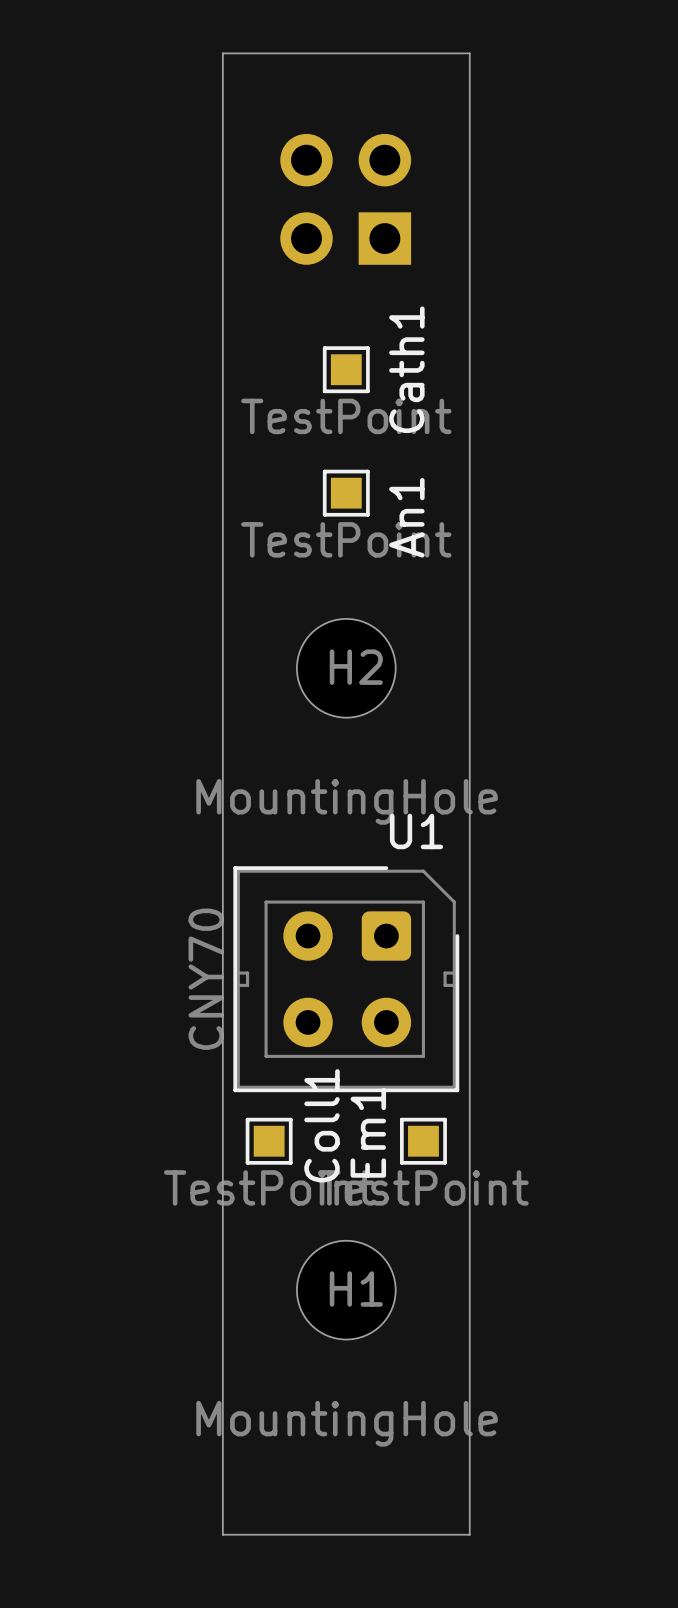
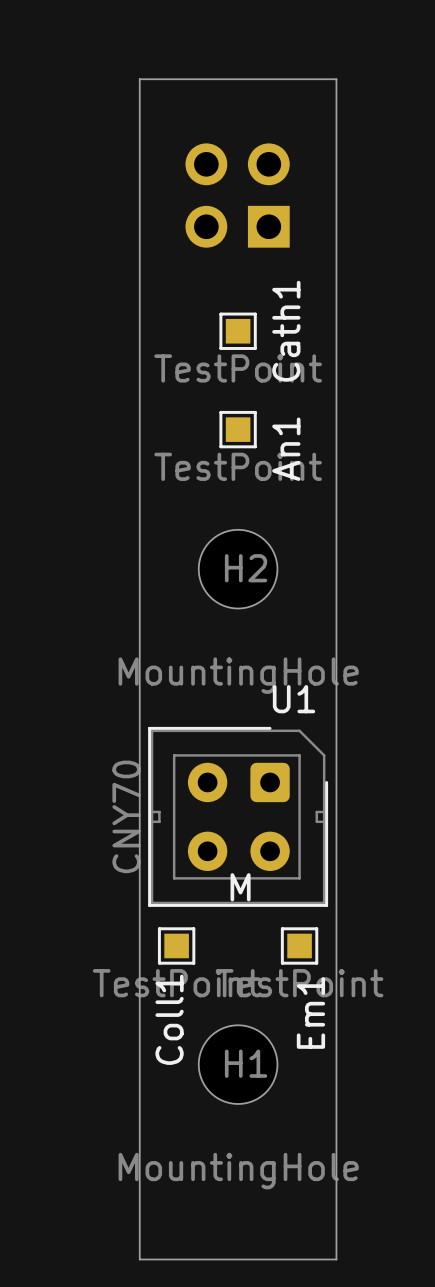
U1 text: none -> M (240, 887)
Coll1 name position: Coll1 (322, 1125) -> Coll1 (169, 1019)
Em1 name position: Em1 (368, 1132) -> Em1 (310, 1013)

